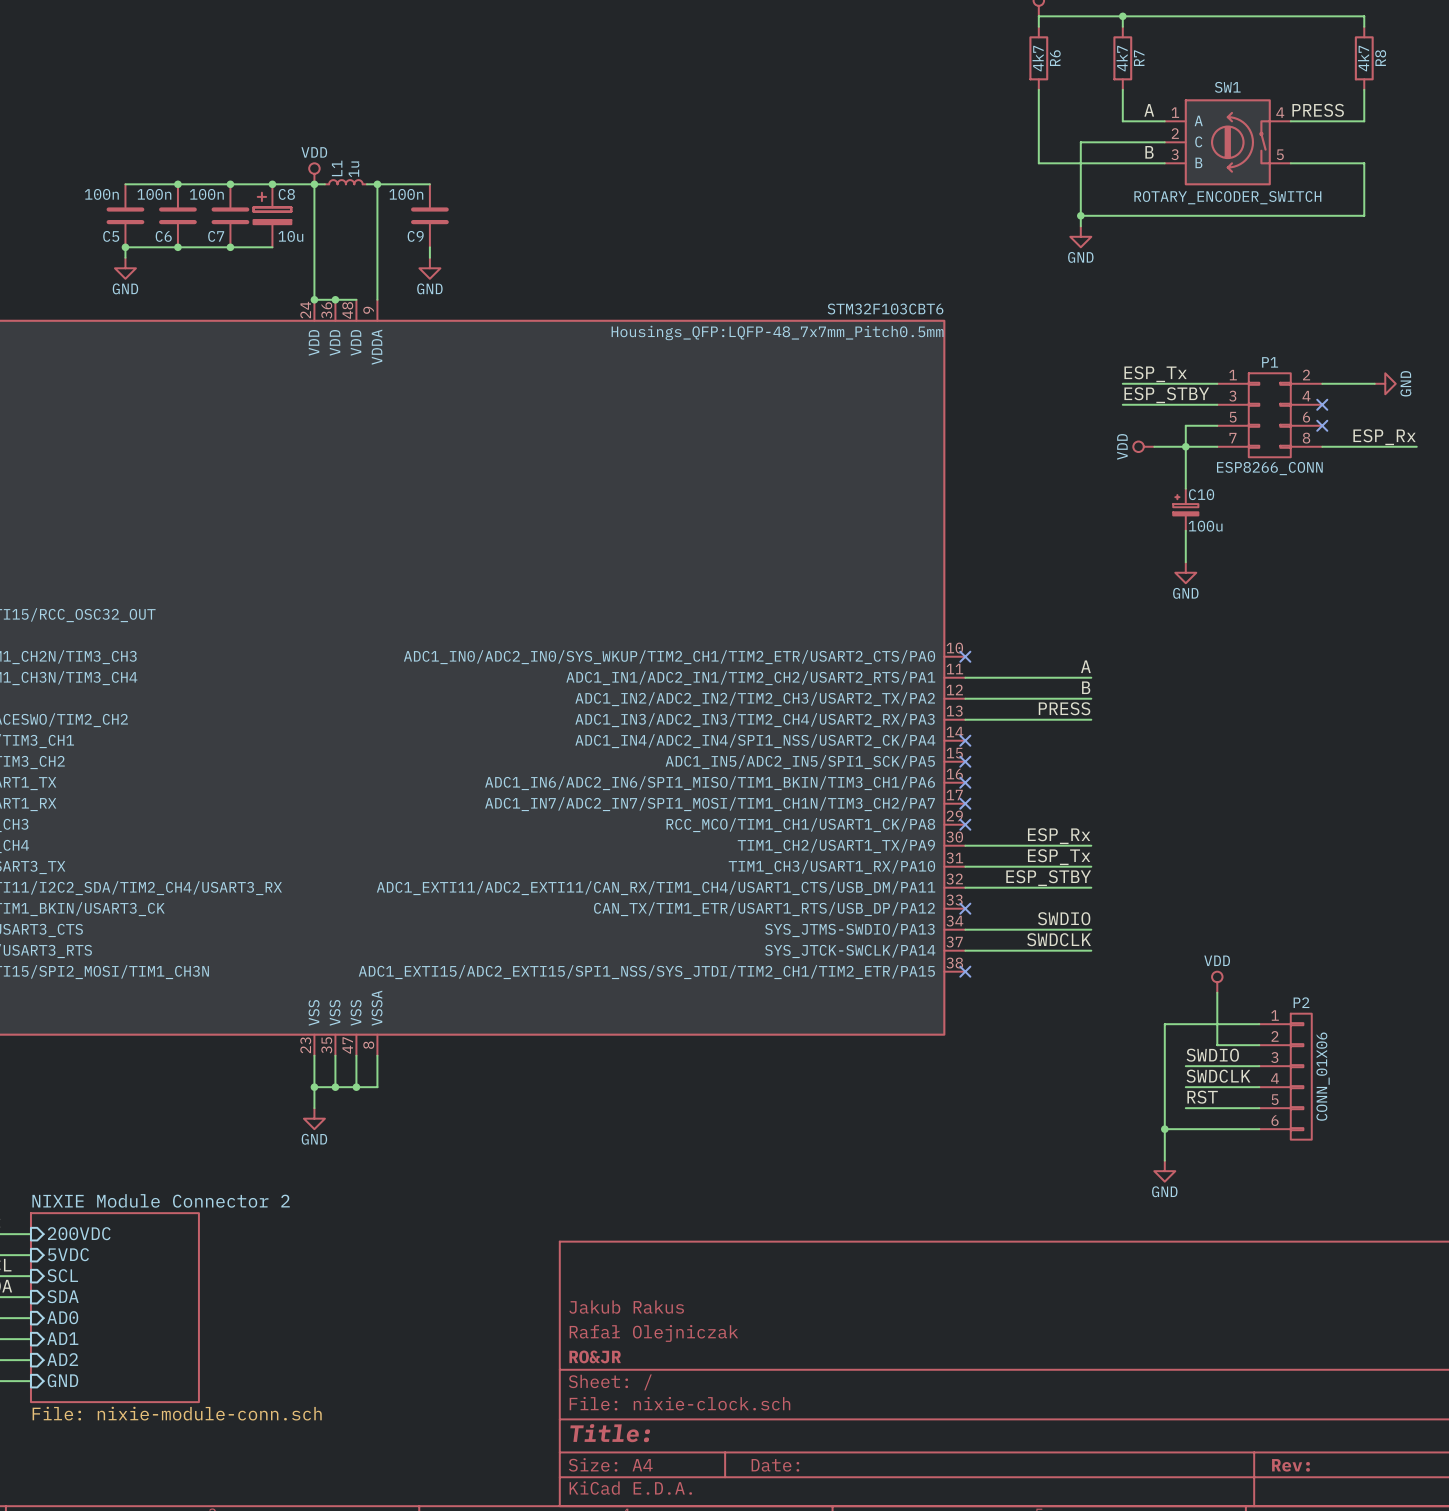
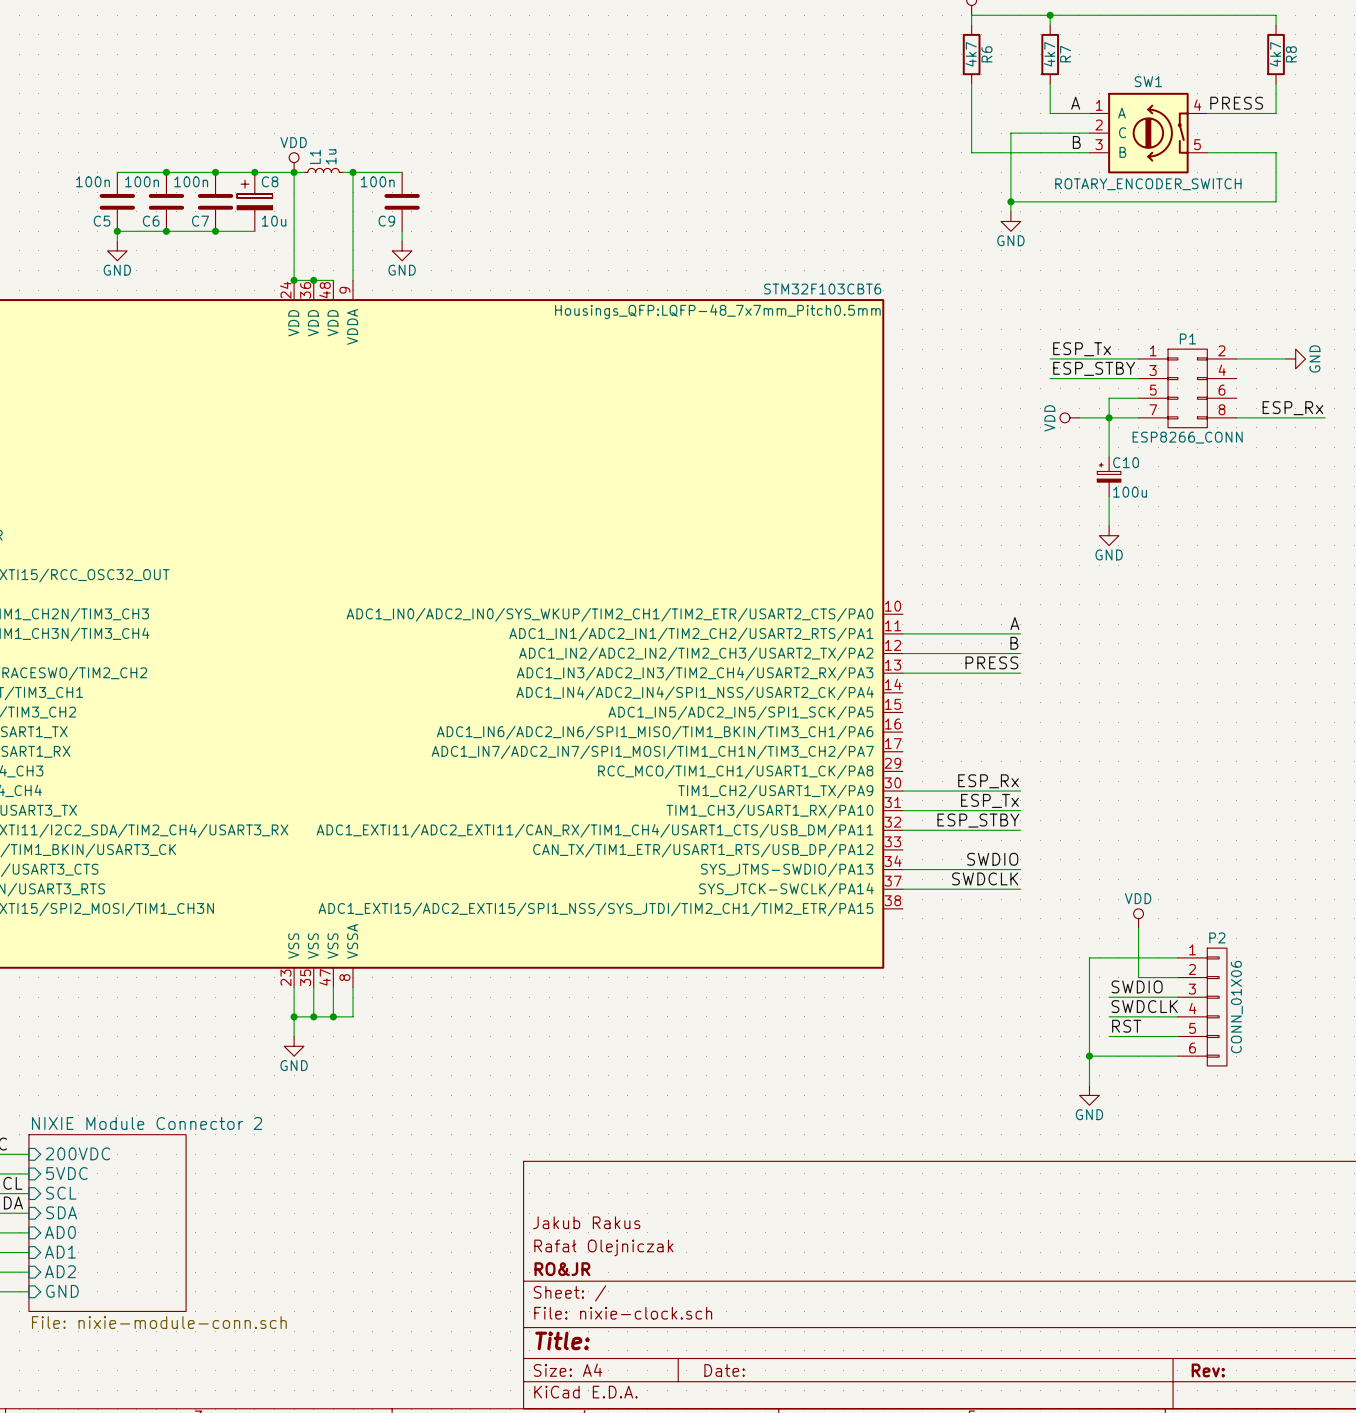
no-connect mark: (1322, 404) -> none
no-connect mark: (1322, 425) -> none
no-connect mark: (965, 656) -> none
no-connect mark: (965, 740) -> none
no-connect mark: (965, 761) -> none
no-connect mark: (965, 782) -> none
no-connect mark: (965, 803) -> none
no-connect mark: (965, 824) -> none
no-connect mark: (965, 908) -> none
no-connect mark: (965, 971) -> none

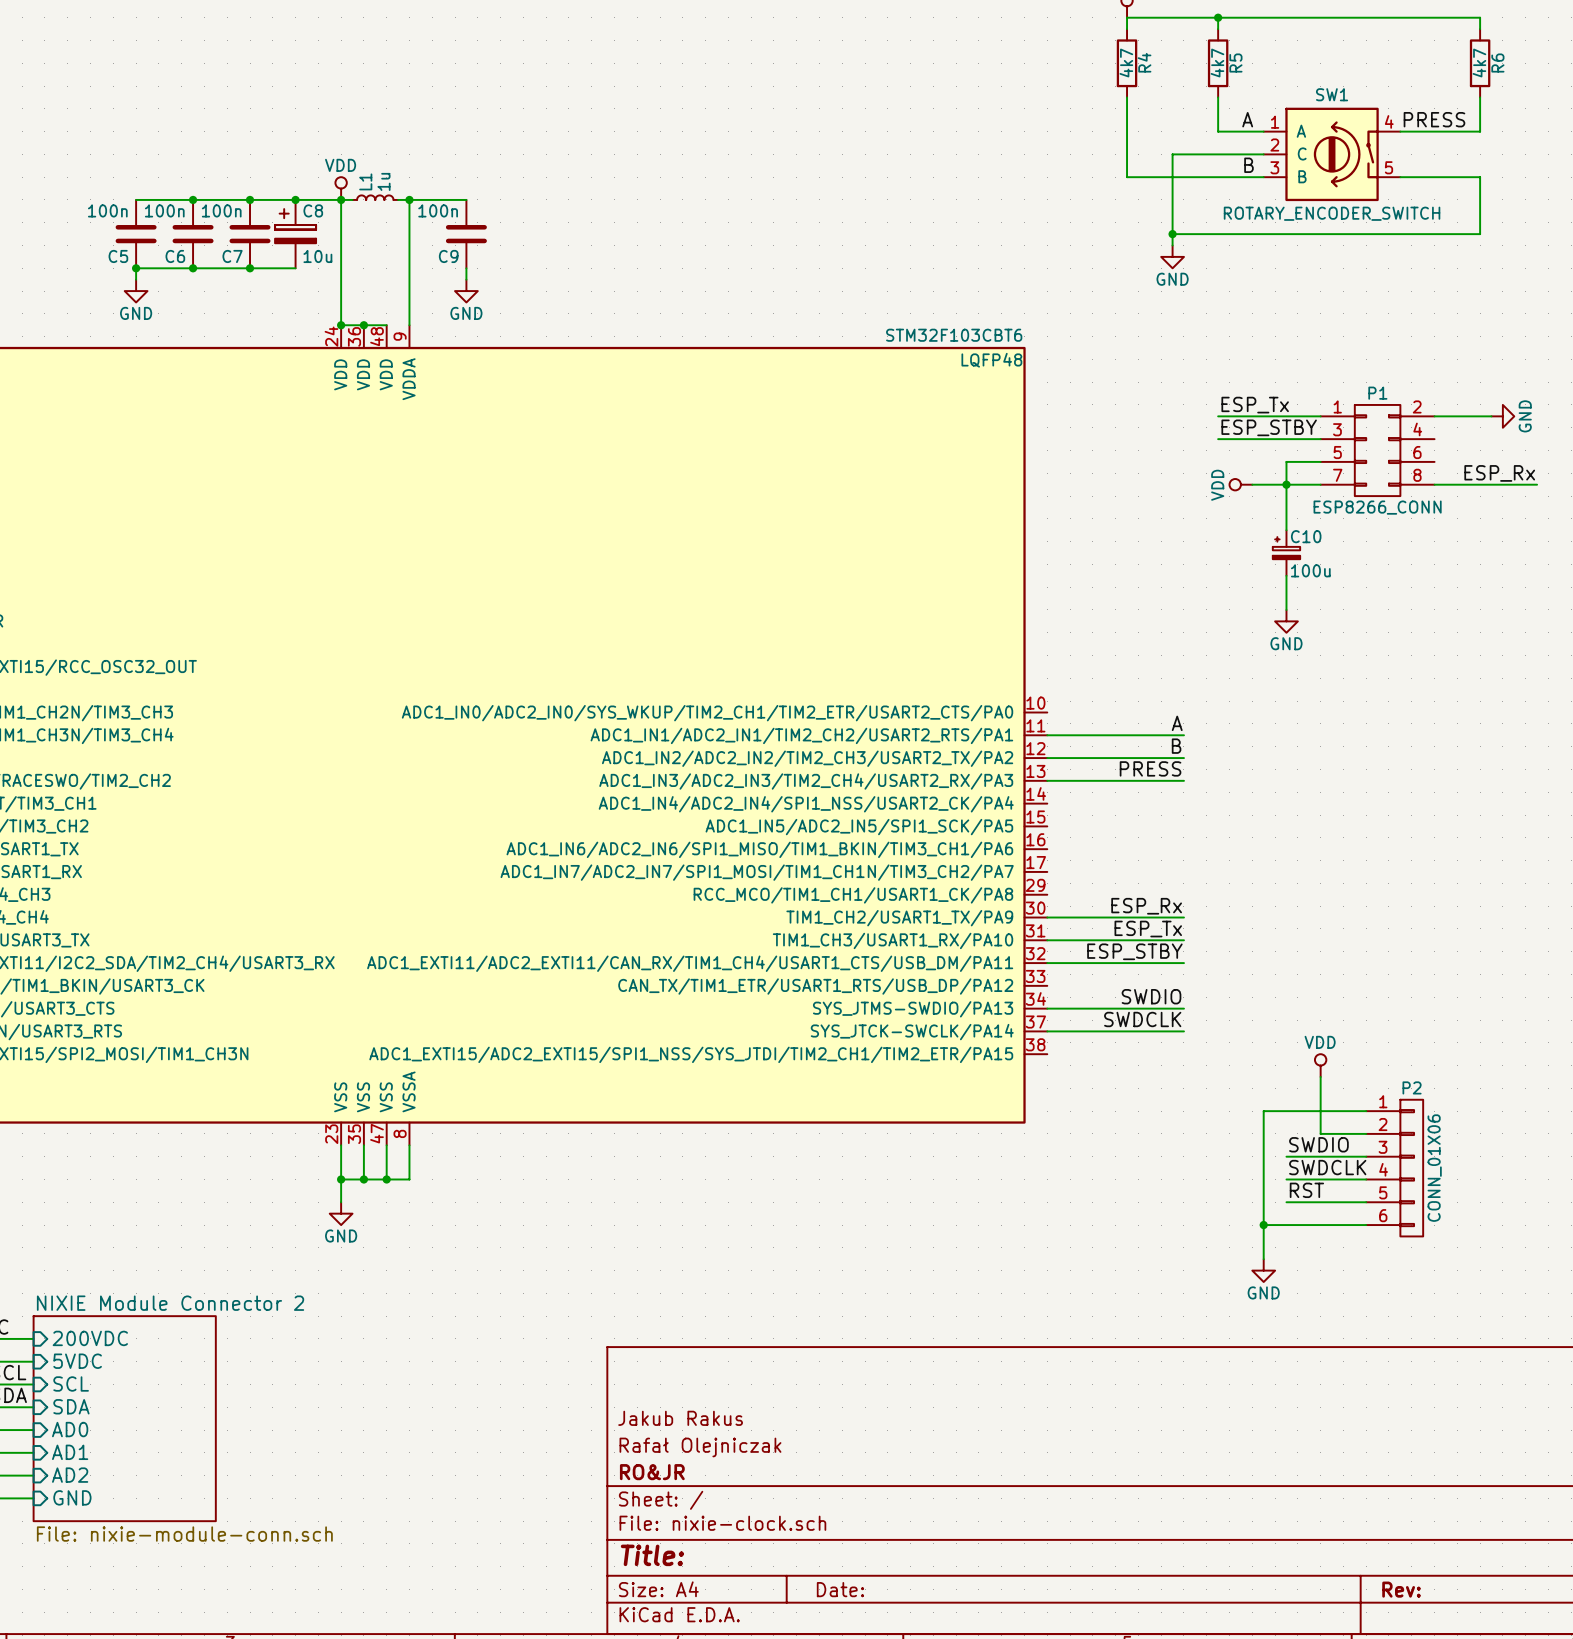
R6 name: R6 (986, 54) -> R4 (1144, 62)
R7 name: R7 (1065, 54) -> R5 (1235, 63)
R8 name: R8 (1291, 54) -> R6 (1497, 63)
part text: Housings_QFP:LQFP-48_7x7mm_Pitch0.5mm (717, 311) -> LQFP48 (991, 360)

